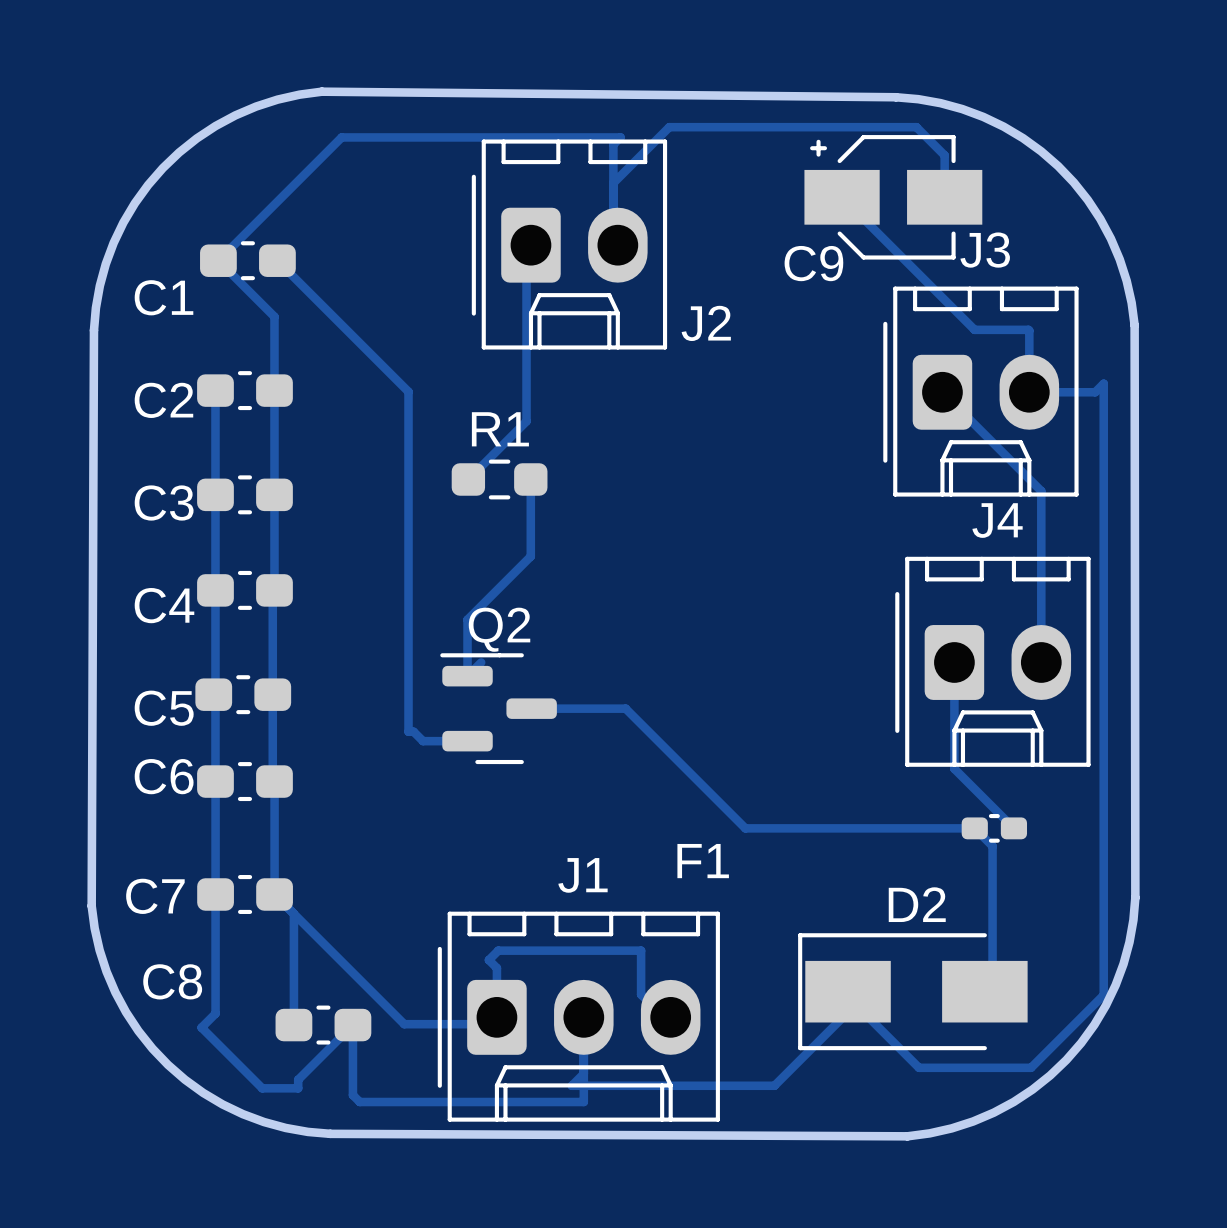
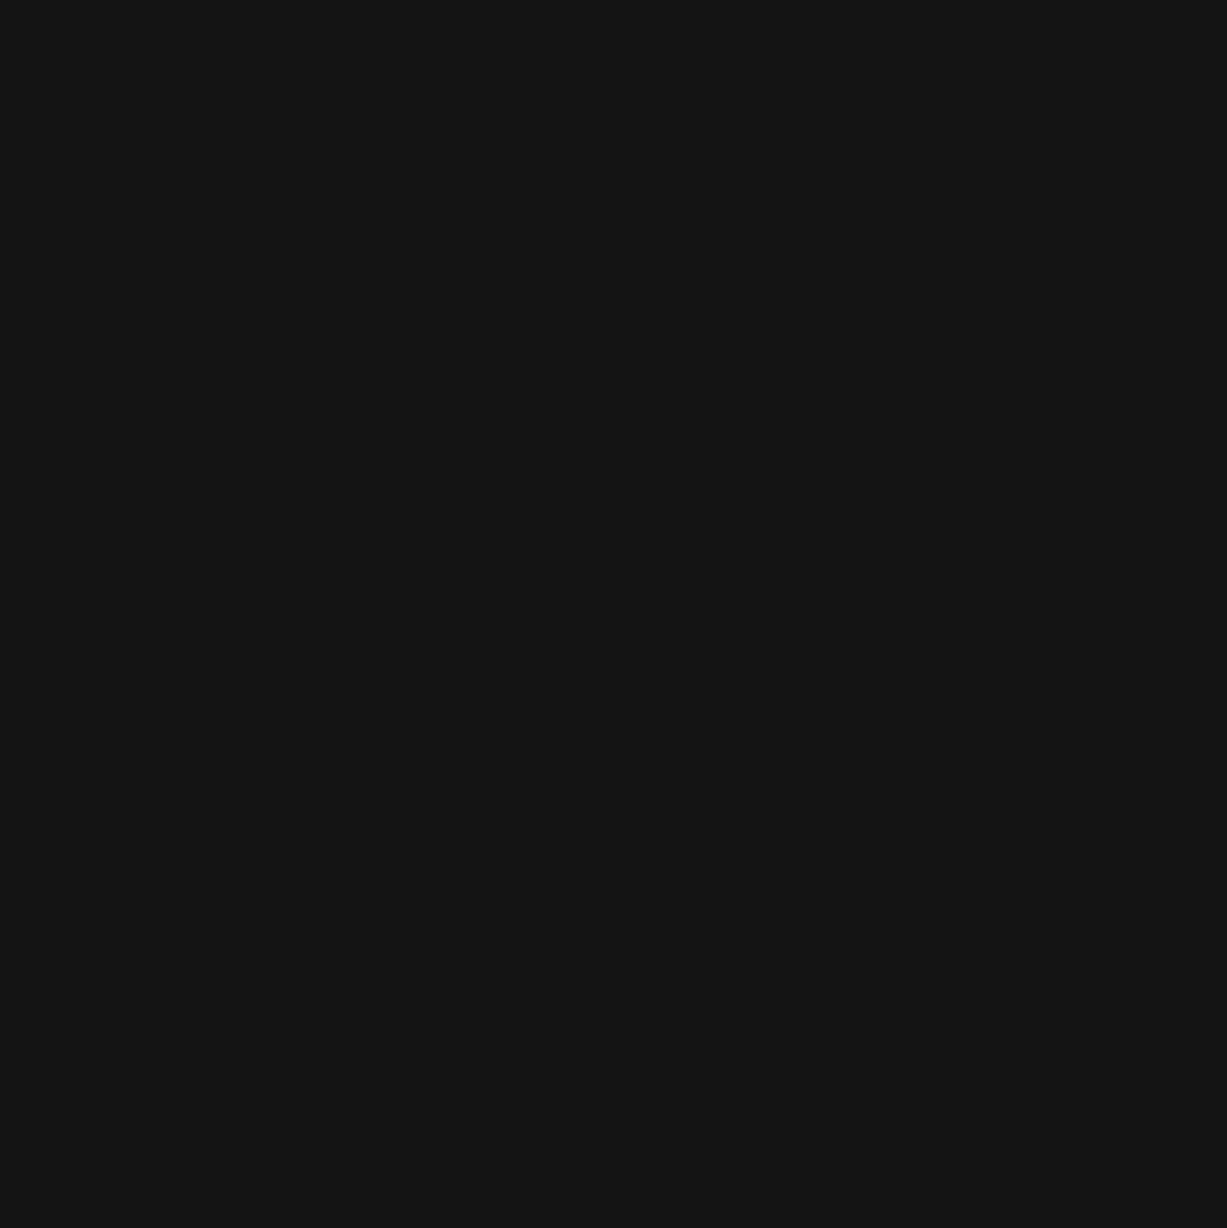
board edge: (321, 91) (895, 97) (918, 99) (962, 109) (983, 116) (1023, 138) (1058, 166) (1087, 200) (1110, 238) (1119, 259) (1131, 302) (1134, 325) (1135, 897) (1129, 942) (1115, 985) (1105, 1005) (1081, 1042) (1066, 1059) (1032, 1089) (993, 1112) (973, 1121) (951, 1128) (907, 1136) (330, 1133) (307, 1131) (264, 1122) (222, 1104) (185, 1079) (168, 1064) (138, 1031) (126, 1012) (106, 971) (94, 928) (91, 905) (93, 330) (99, 285) (105, 264) (123, 222) (148, 185) (179, 152) (215, 126) (235, 115) (277, 99) (321, 91) -> none
track: (613, 183) (669, 127) (916, 127) (944, 155) (944, 197) -> none
track: (842, 197) (974, 329) (1029, 330) (1029, 392) (1095, 392) (1103, 383) (1103, 995) (1031, 1067) (919, 1067) (855, 1004) (774, 1085) (571, 1085) (583, 1073) -> none
C9: (893, 197) -> none
J2: (569, 244) -> none
track: (526, 245) (526, 421) (468, 479) -> none
track: (613, 245) (613, 144) (620, 137) (341, 137) (218, 260) (274, 316) (272, 779) (274, 781) (274, 894) (404, 1024) (496, 1024) (496, 968) (488, 960) (498, 950) (641, 950) (641, 994) (670, 1024) -> none
C1: (247, 260) -> none
track: (277, 260) (408, 391) (408, 731) (413, 731) (423, 741) (467, 741) -> none
track: (215, 390) (215, 686) (213, 694) (215, 696) (215, 1013) (201, 1027) (262, 1088) (298, 1088) (298, 1079) (352, 1025) (352, 1095) (359, 1102) (583, 1102) (583, 1024) -> none
C2: (244, 390) -> none
J3: (980, 391) -> none
track: (942, 392) (1041, 491) (1041, 662) -> none
R1: (499, 479) -> none
track: (530, 479) (530, 556) (467, 619) (467, 676) (481, 662) -> none
C3: (244, 494) -> none
C4: (244, 590) -> none
J4: (992, 661) -> none
track: (954, 662) (954, 768) (1013, 828) -> none
C5: (243, 694) -> none
Q2: (498, 708) -> none
track: (531, 708) (625, 708) (745, 828) (974, 828) (992, 846) (992, 1004) -> none
C6: (244, 781) -> none
F1: (994, 828) -> none
C7: (245, 894) -> none
track: (293, 913) (293, 1025) -> none
D2: (912, 991) -> none
J1: (578, 1016) -> none
C8: (323, 1025) -> none

